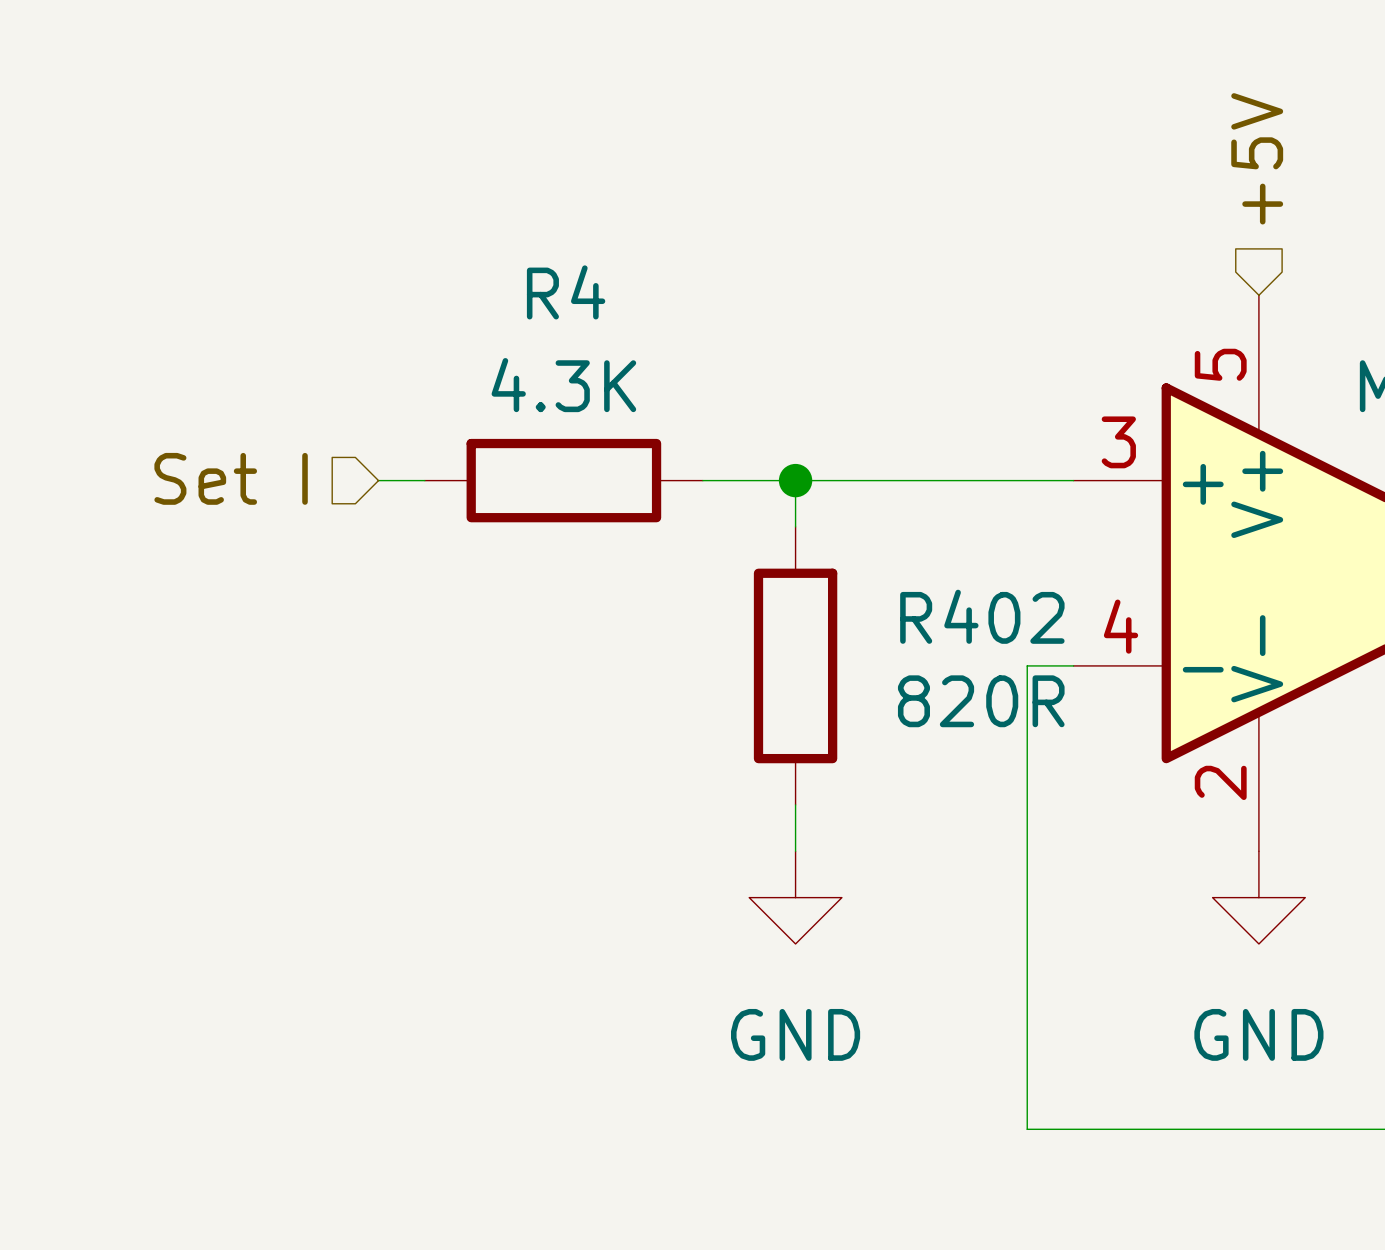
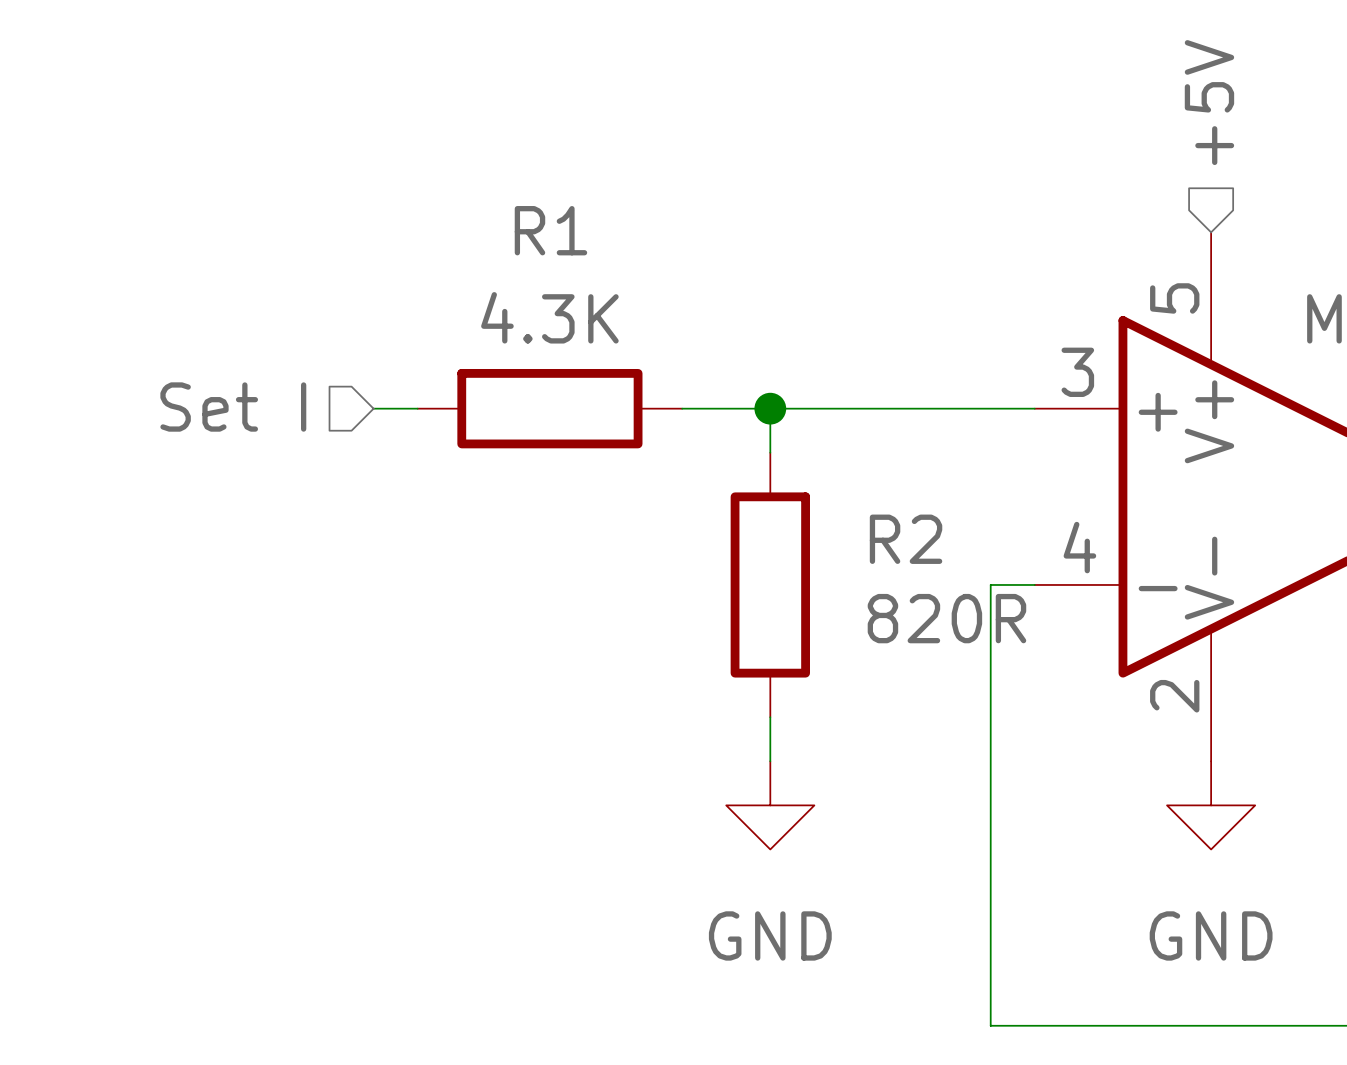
R4 name: R4 (566, 292) -> R1 (550, 230)
R402 name: R402 (982, 616) -> R2 (906, 539)

